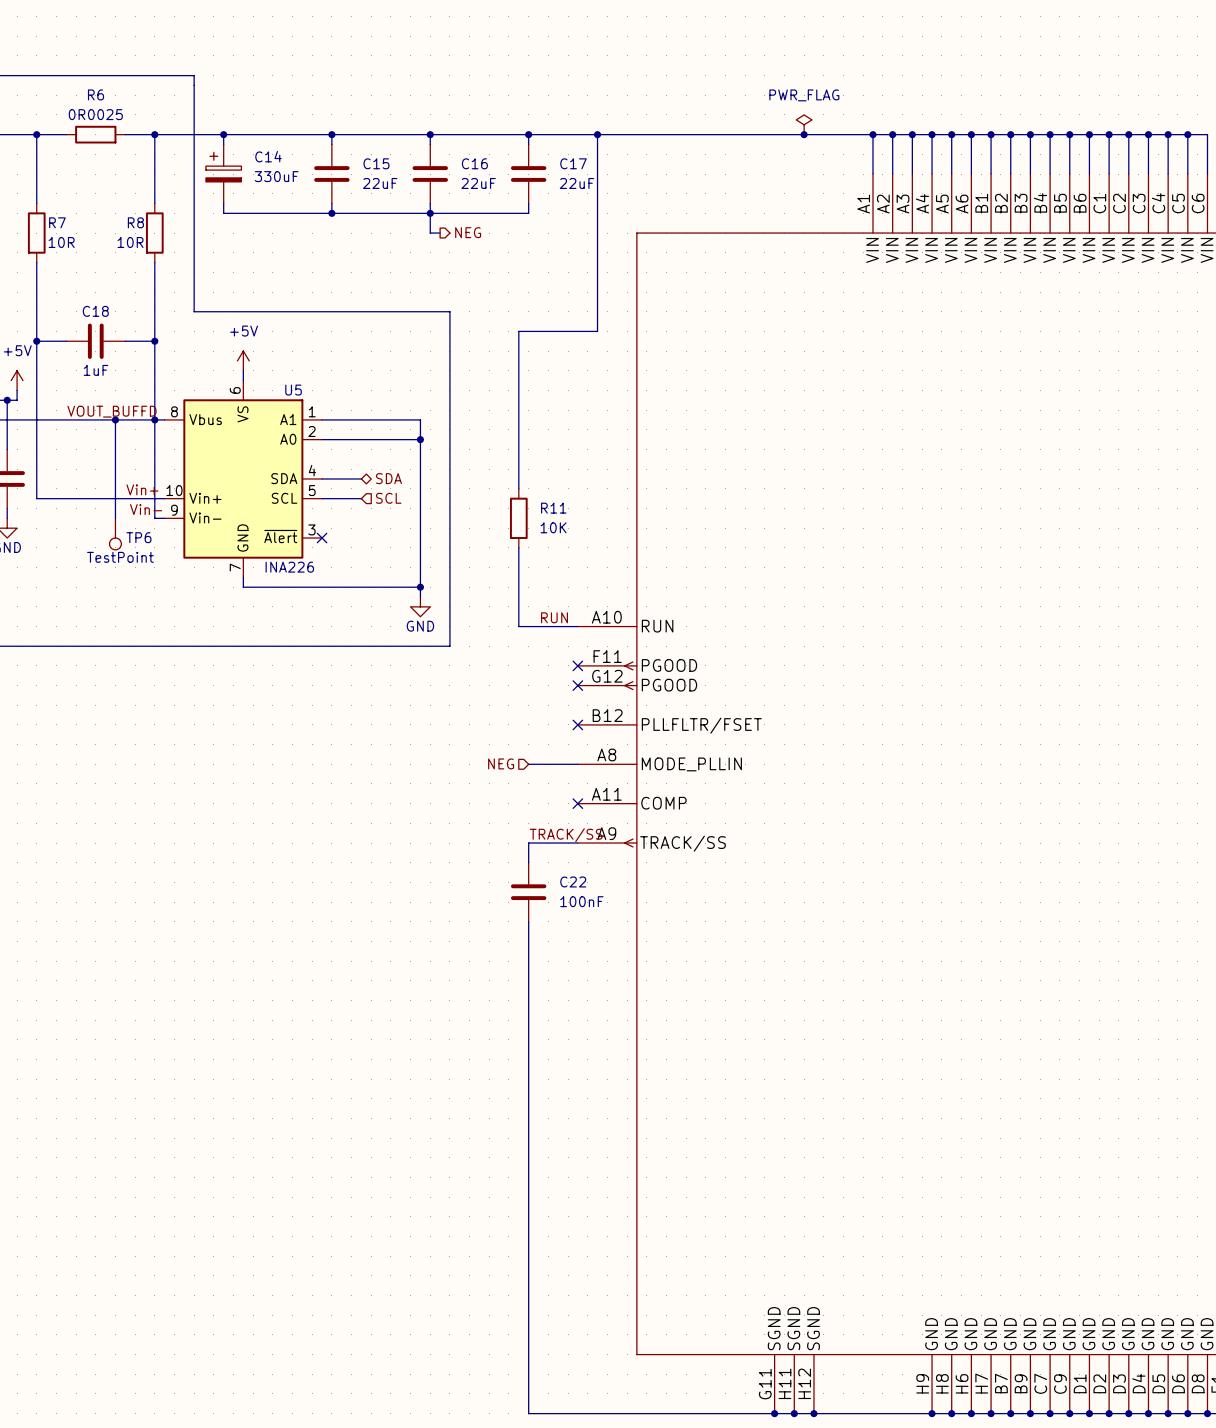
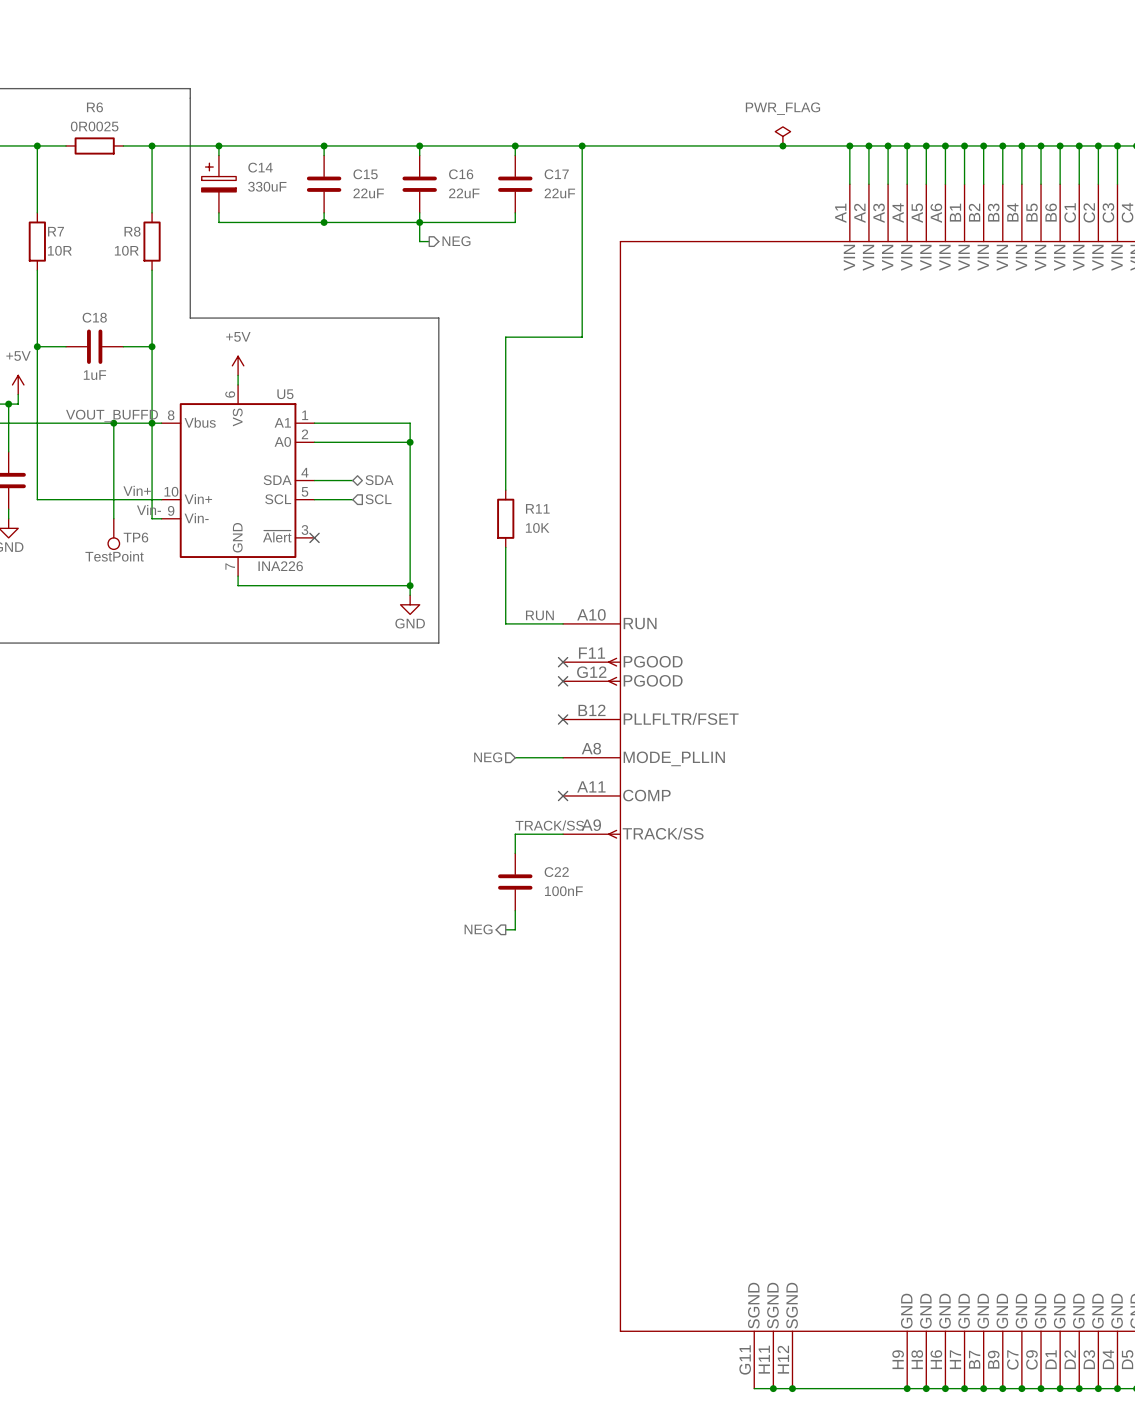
hierarchical label: none -> NEG (478, 929)
wire: (528, 941) (528, 1413) (774, 1413) -> (515, 929) (505, 929)
junction: (774, 1413) -> none

